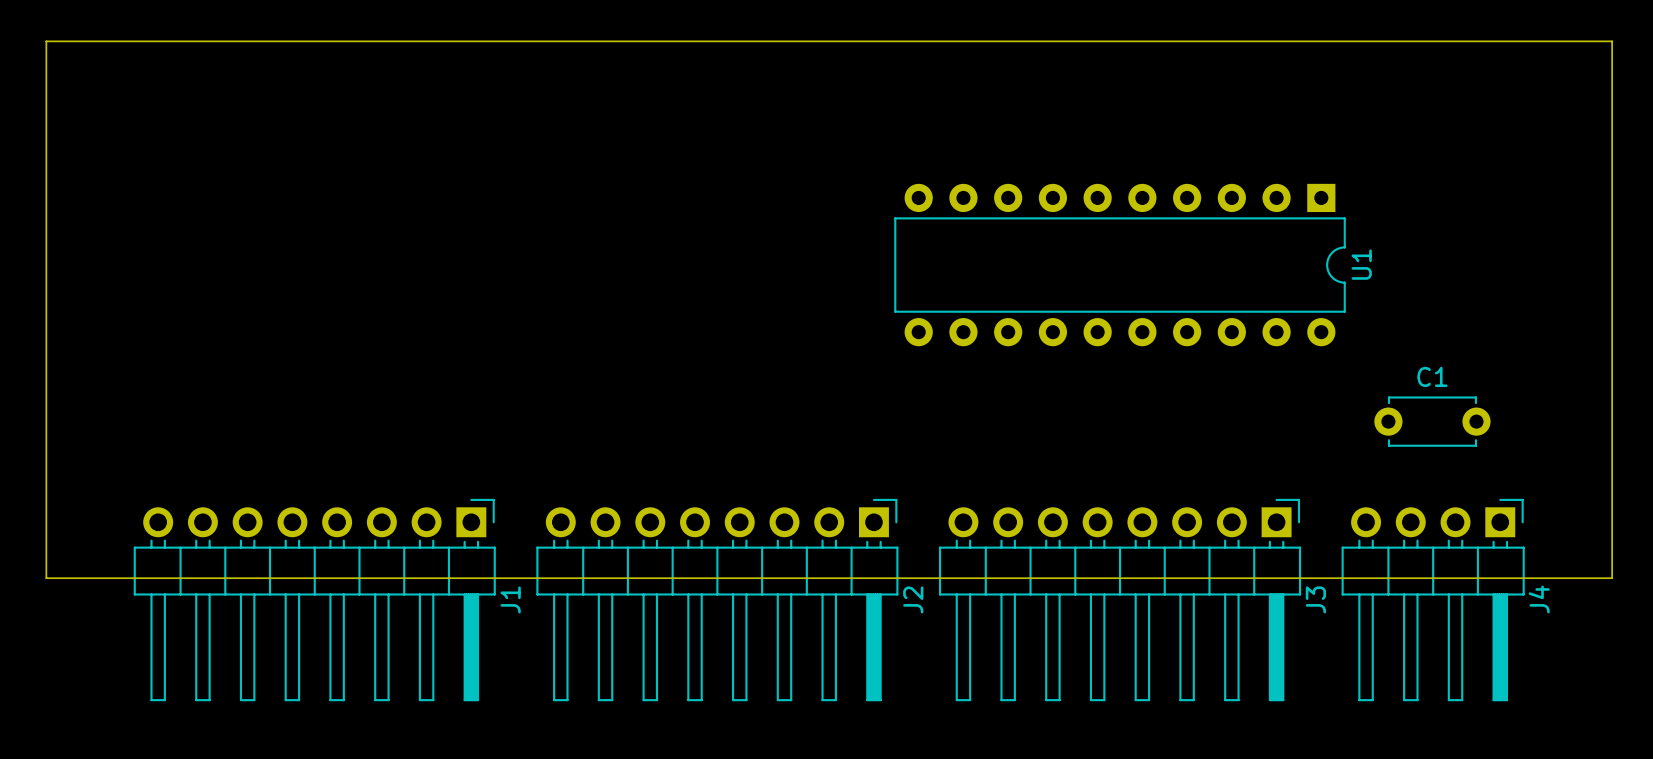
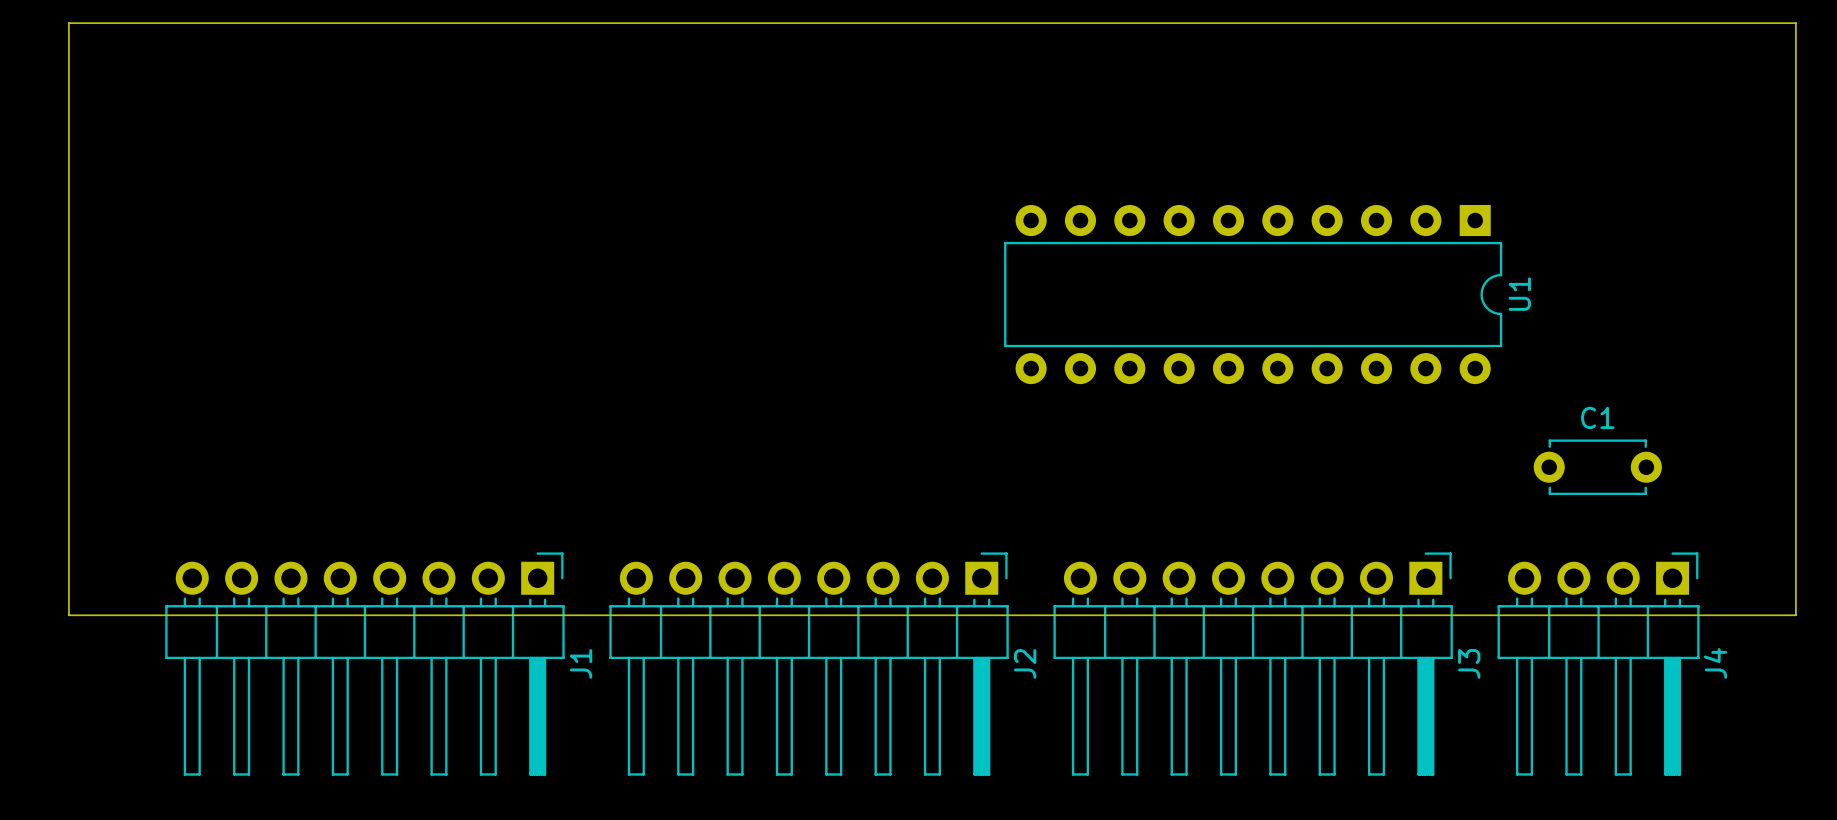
board edge: (46, 41) (1612, 41) -> (68, 47) (68, 23) (1795, 23) (1795, 47)
board edge: (46, 555) (46, 578) (1612, 578) (1612, 555) -> (68, 615) (1795, 615)

